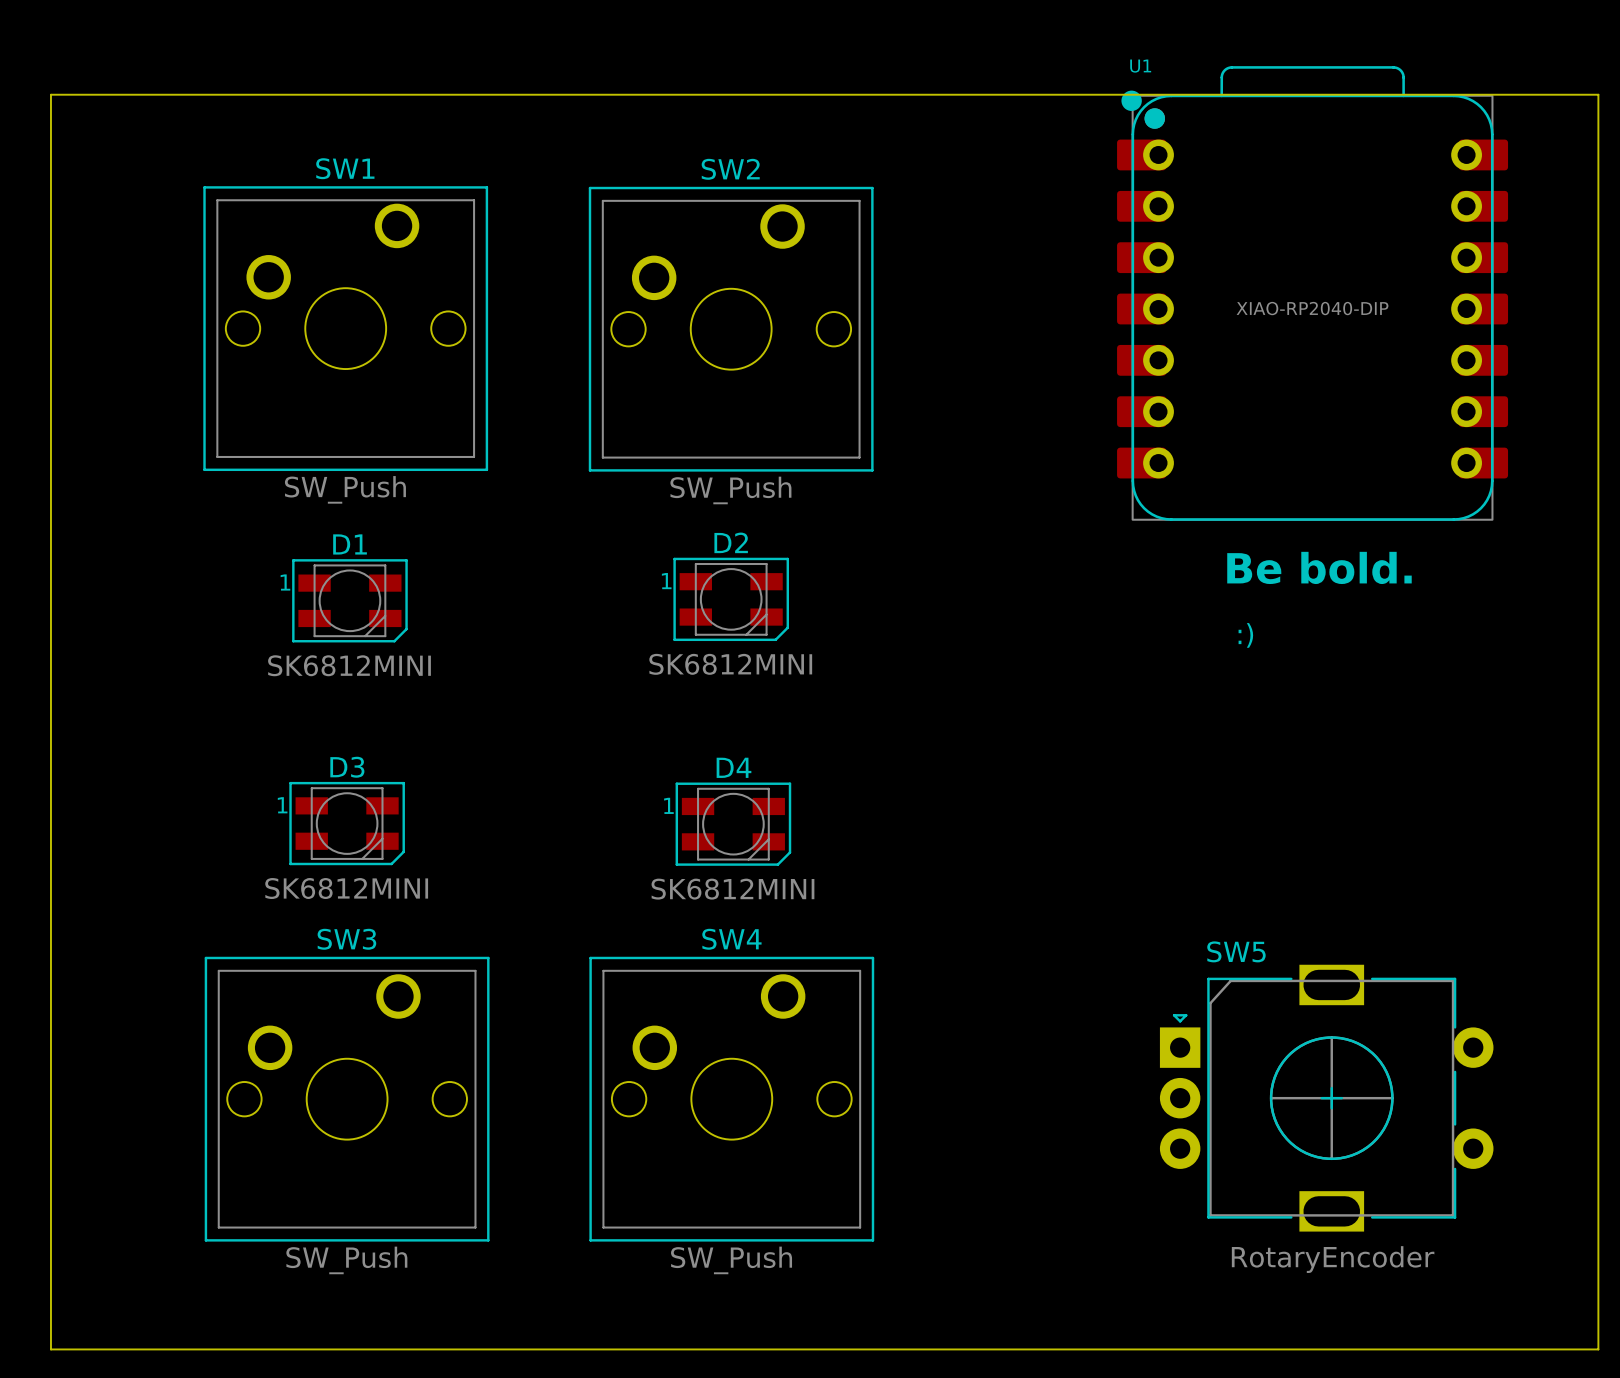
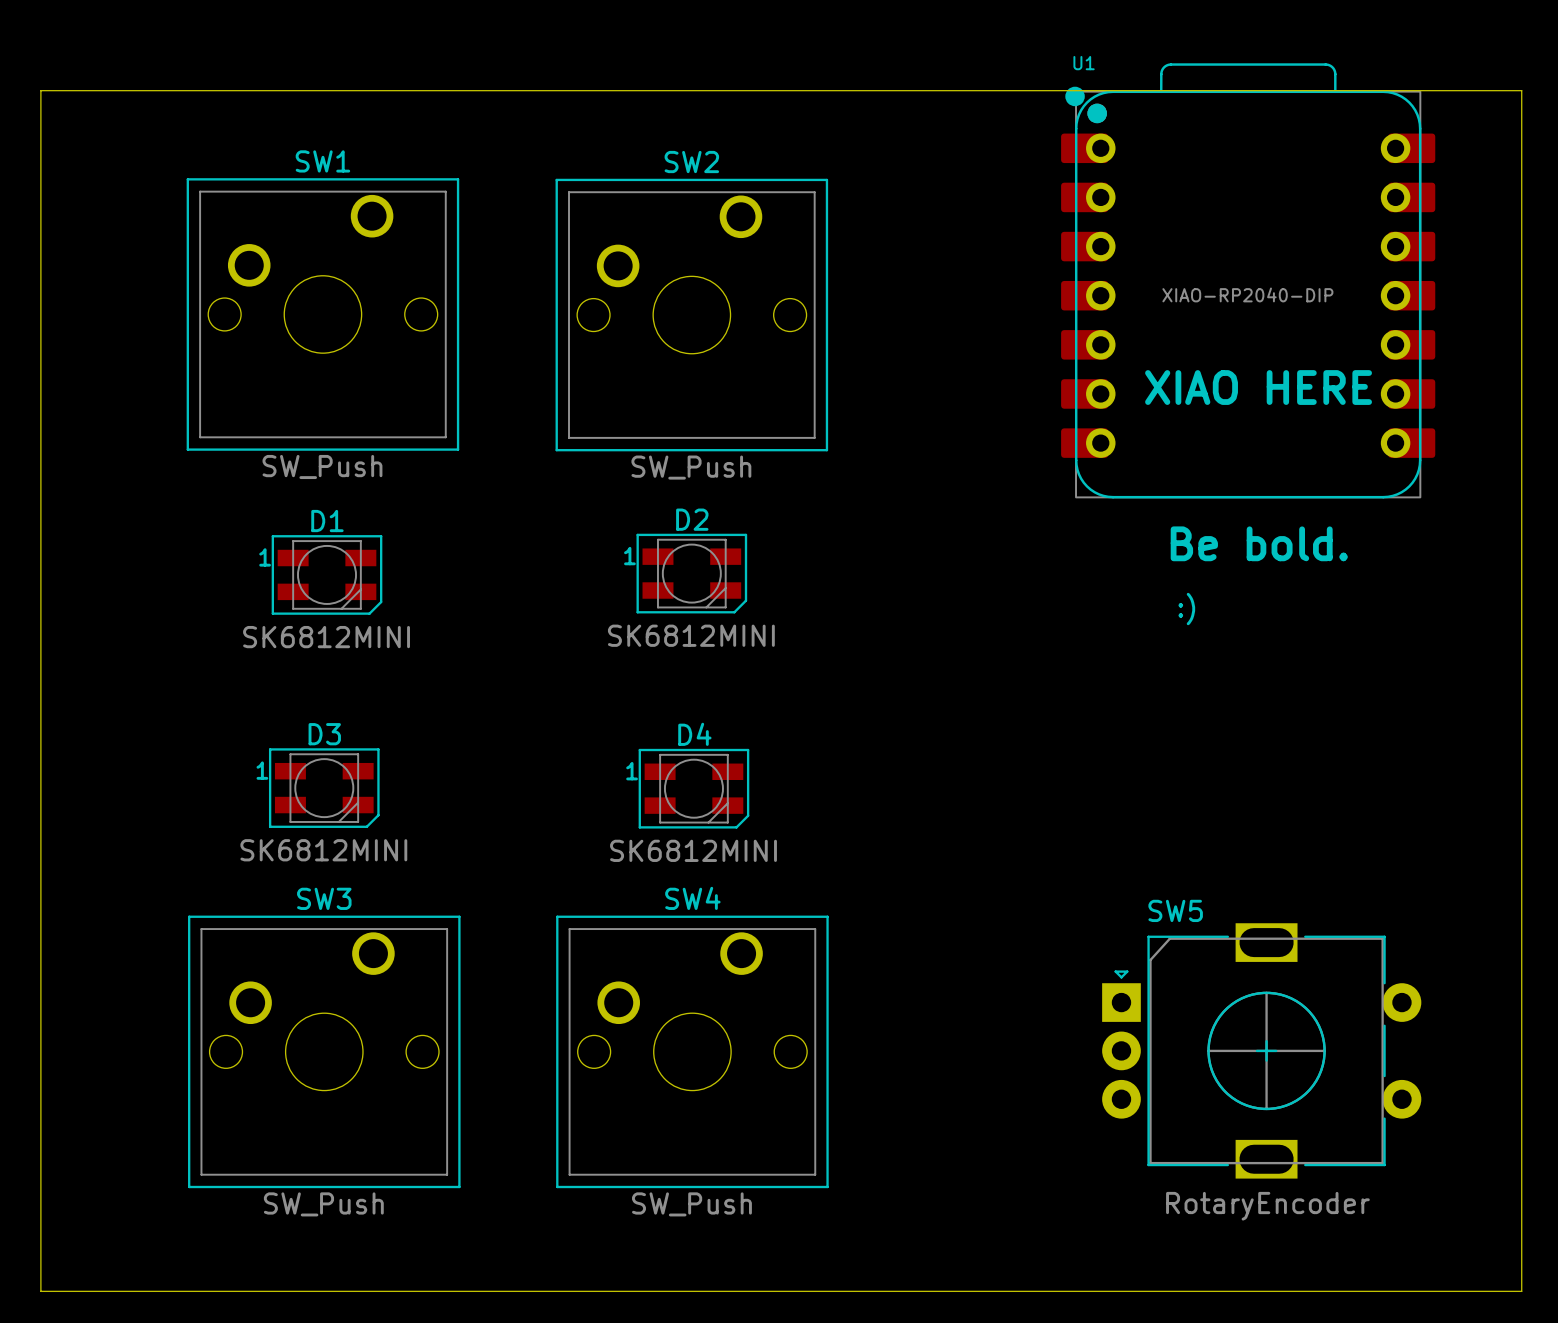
text: none -> XIAO HERE (1258, 387)

